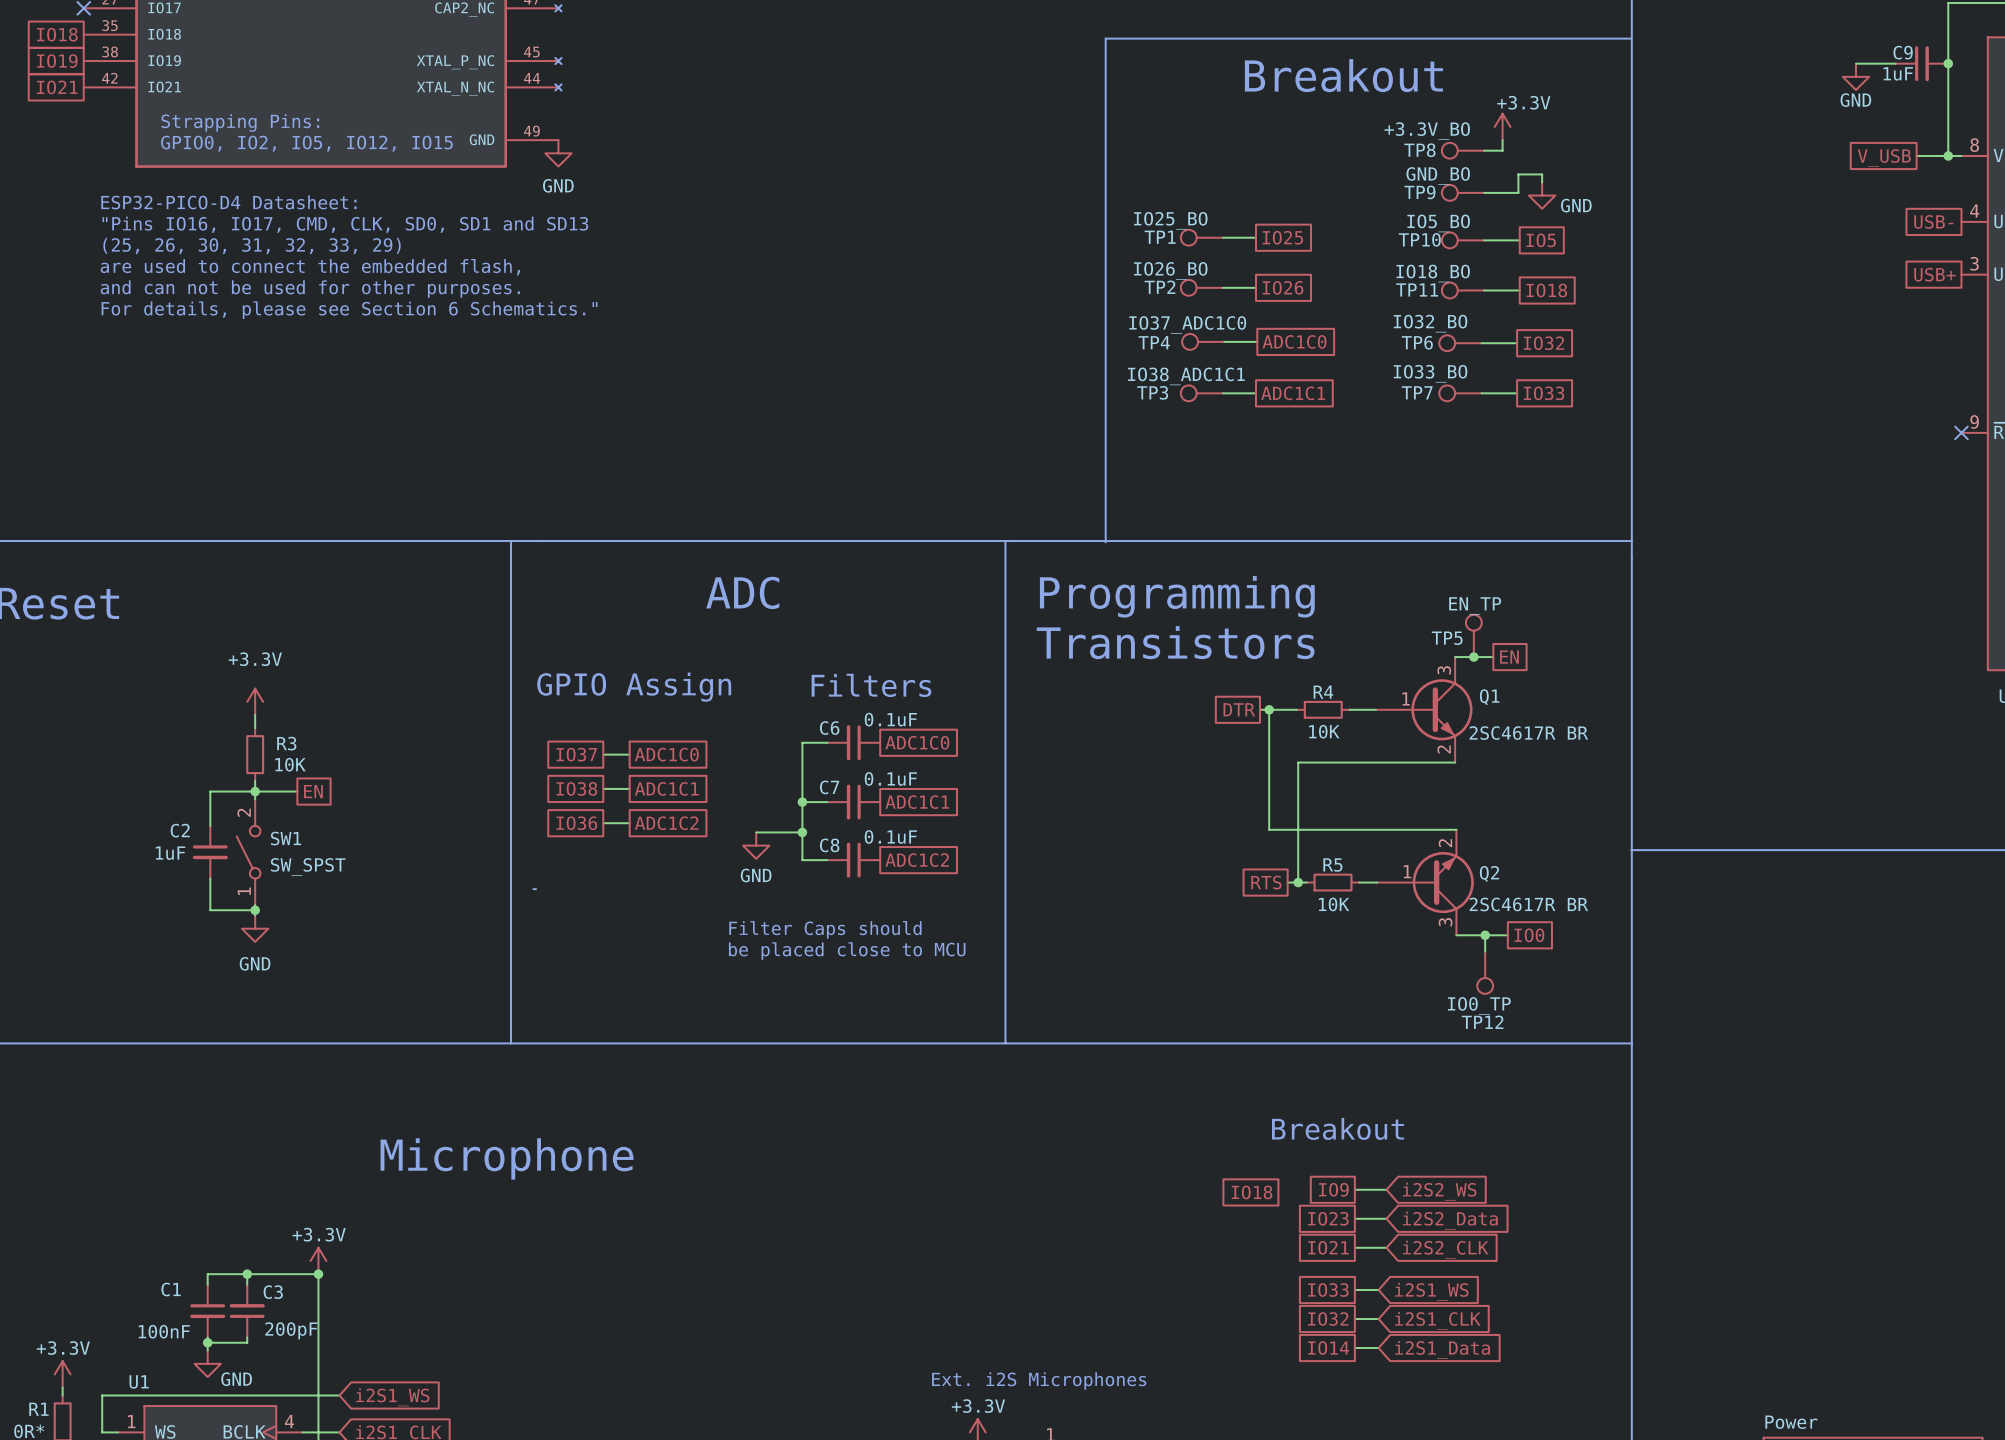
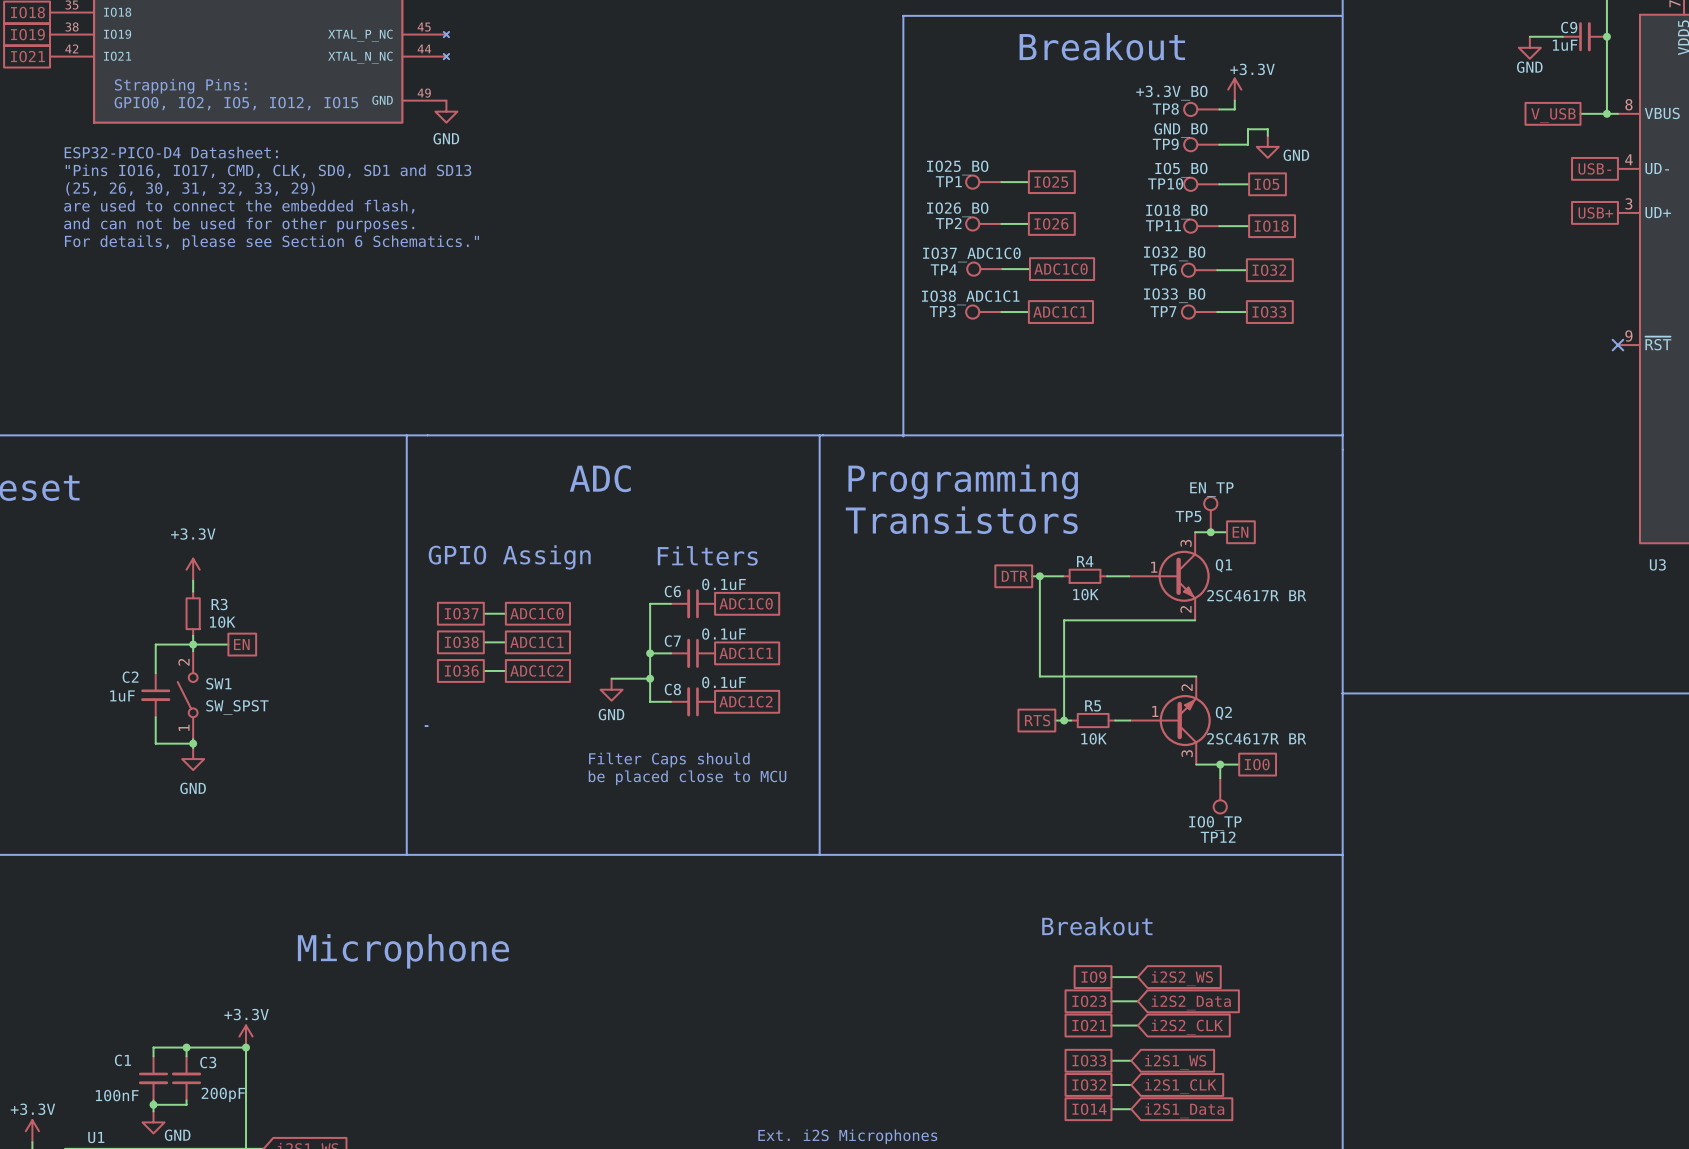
global label: IO18 (1252, 1192) -> none

